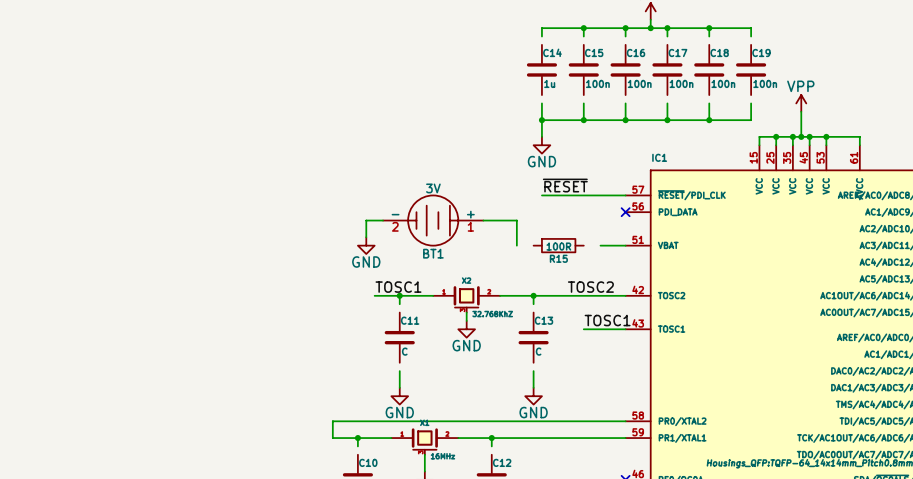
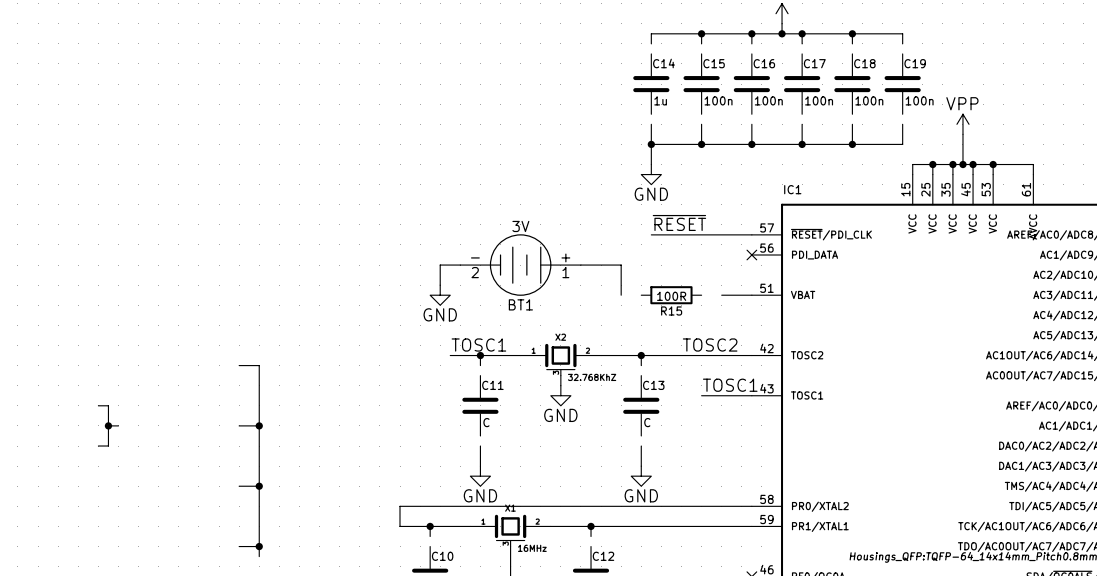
wire: none -> (239, 365) (259, 365) (259, 556)
wire: none -> (98, 405) (108, 405) (108, 446) (98, 446)
wire: none -> (108, 425) (118, 425)
junction: none -> (108, 425)
wire: none -> (239, 425) (259, 425)
junction: none -> (259, 425)
wire: none -> (239, 486) (259, 486)
junction: none -> (259, 486)
wire: none -> (239, 546) (259, 546)
junction: none -> (259, 546)

